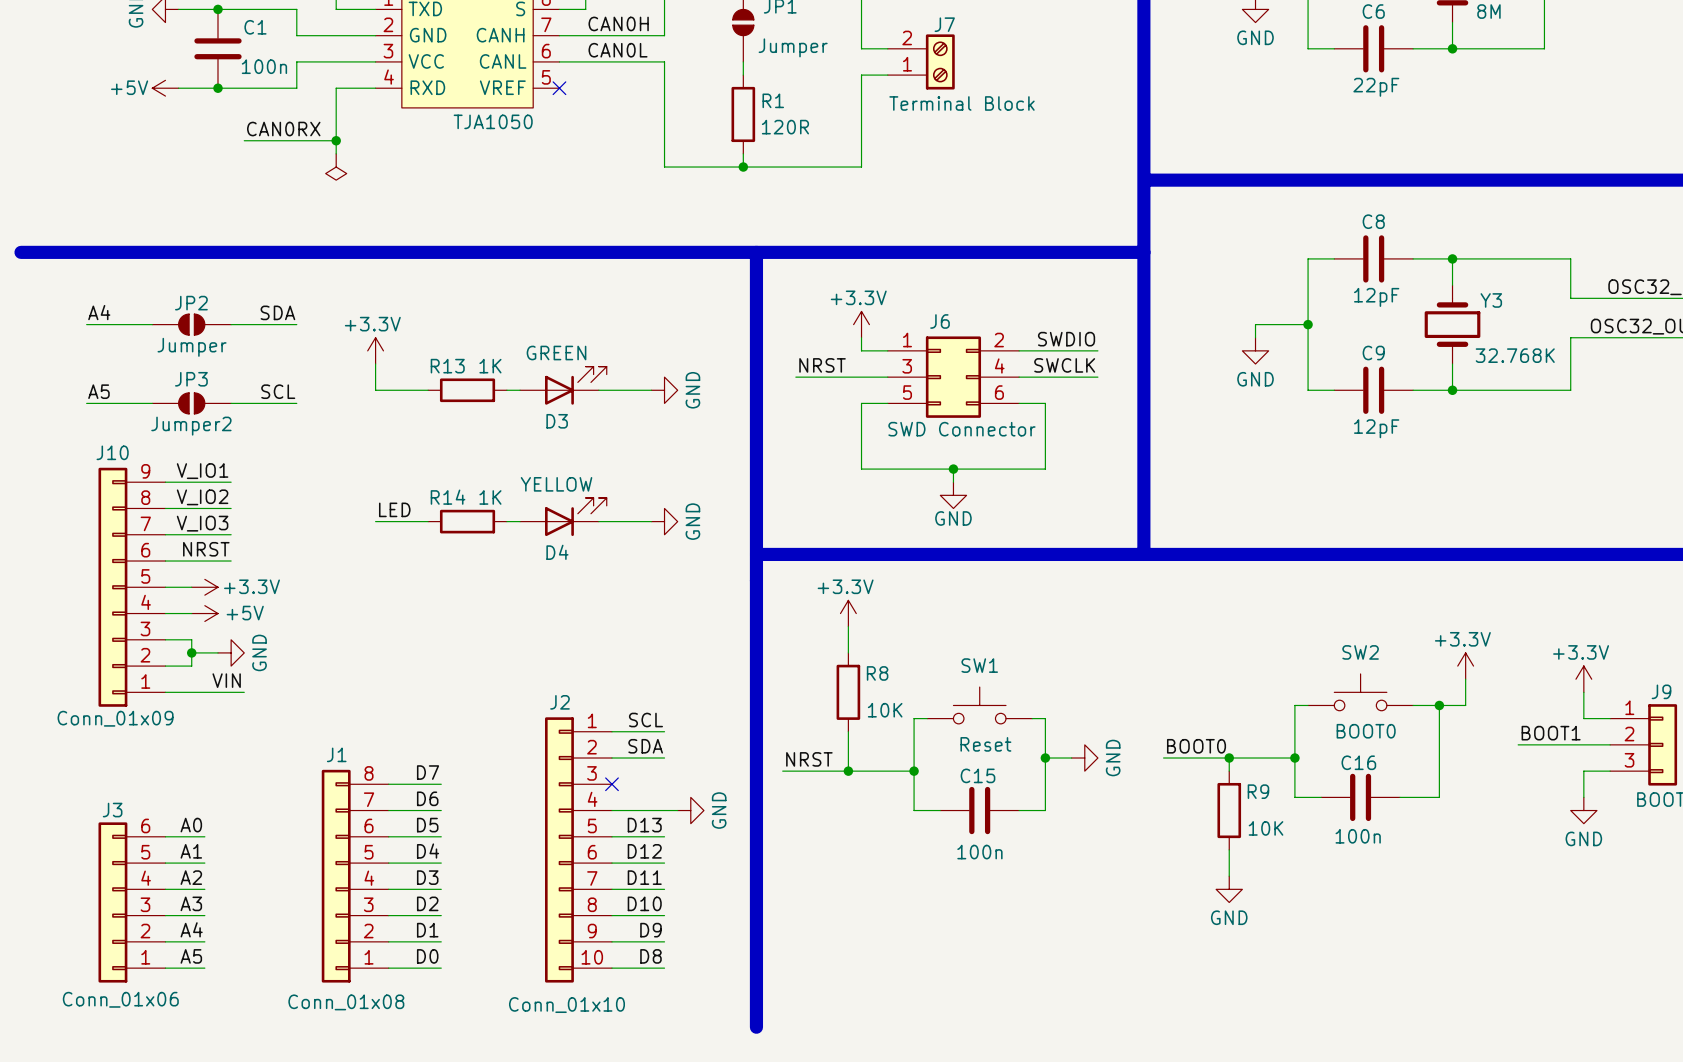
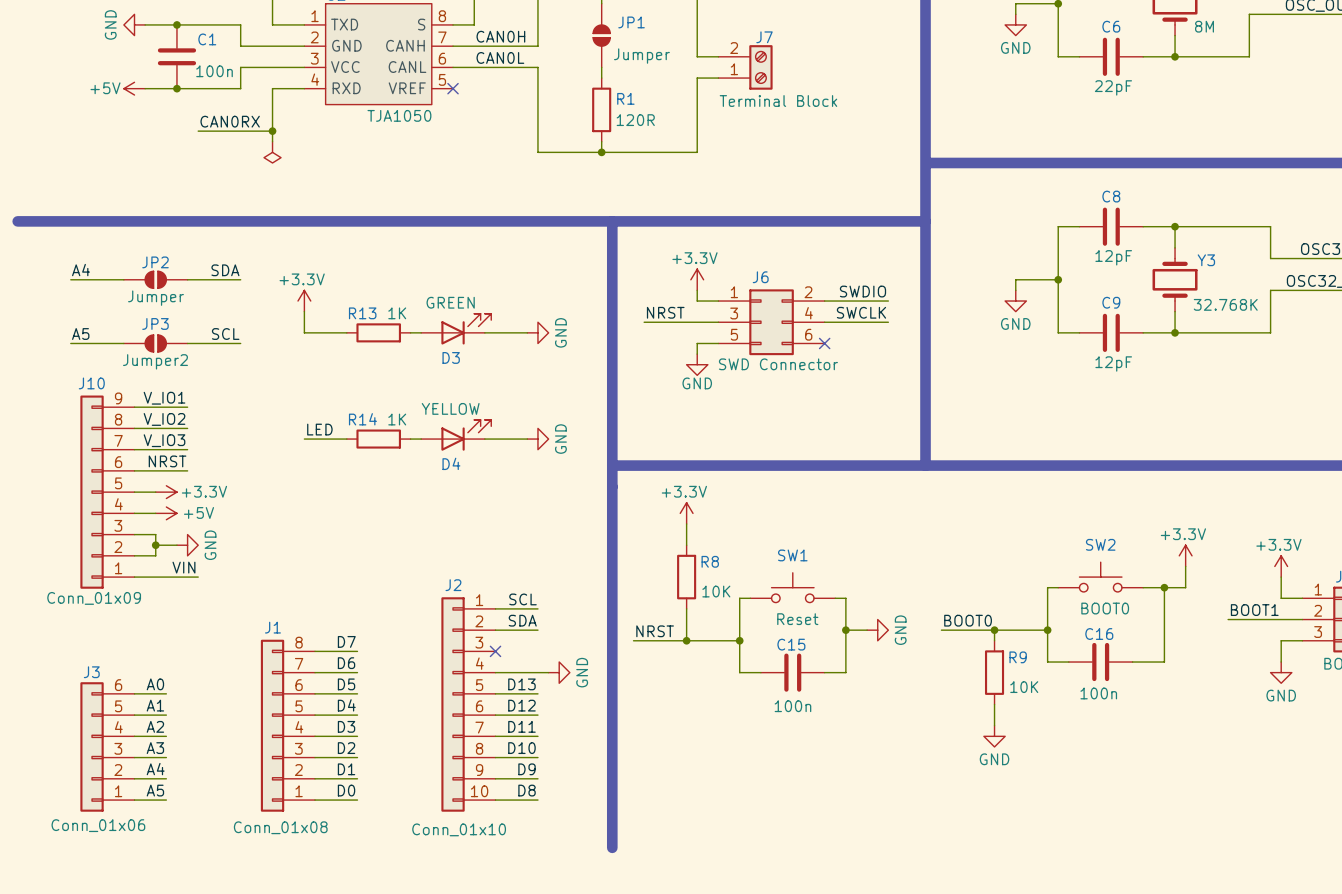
wire: (1019, 403) (1045, 403) (1045, 469) (861, 469) (861, 416) -> none
no-connect mark: none -> (824, 343)
wire: (953, 469) (953, 482) -> none
junction: (953, 469) -> none
power symbol position: GND (953, 495) -> GND (697, 364)

